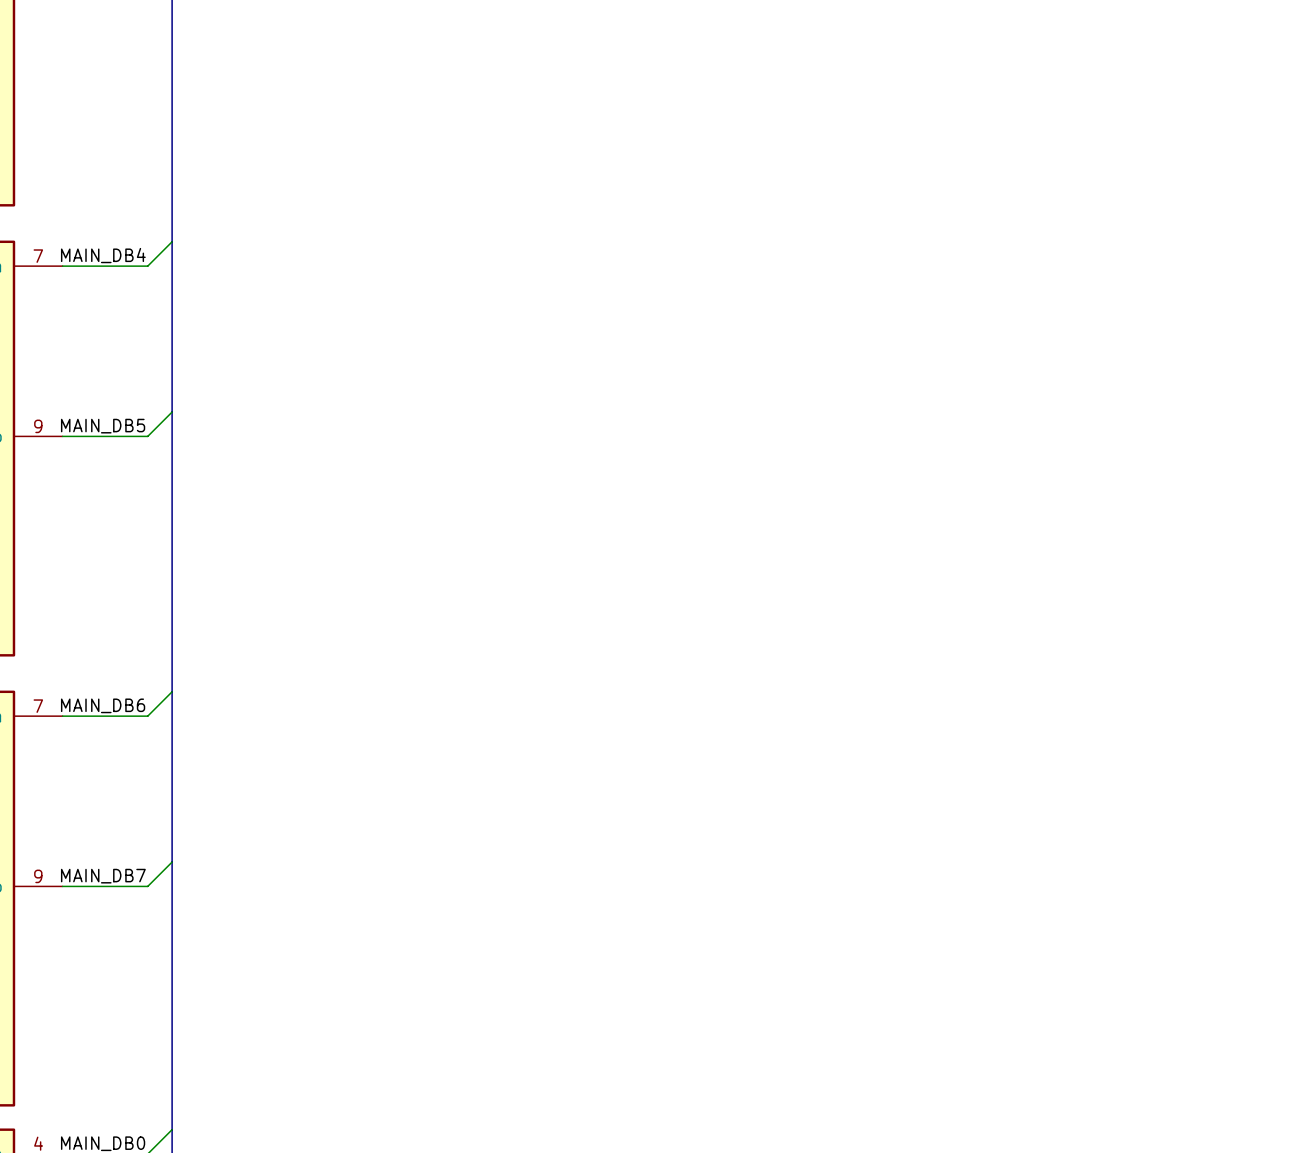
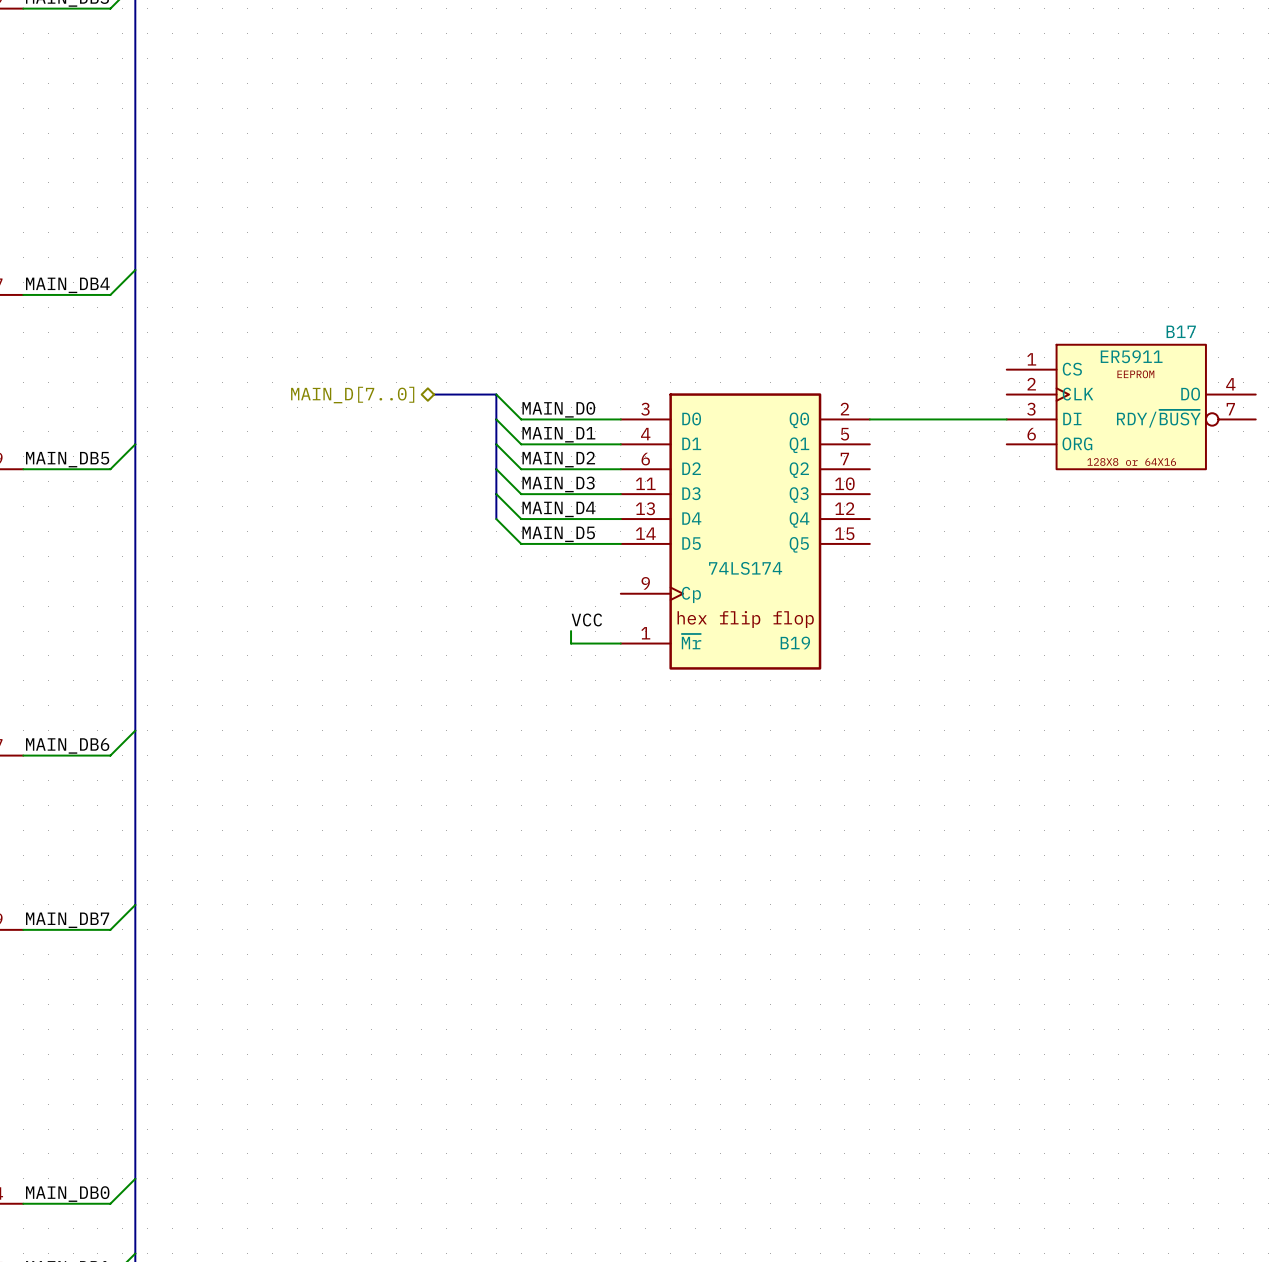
bus: none -> (434, 394) (496, 394) (496, 519)
wire: none -> (496, 394) (521, 419) (620, 419)
hierarchical label: none -> MAIN_D[7..0] (352, 395)
B17: none -> ER5911 (1131, 407)
label: none -> MAIN_D0 (558, 409)
wire: none -> (496, 419) (521, 444) (620, 444)
wire: none -> (869, 419) (1006, 419)
label: none -> MAIN_D1 (558, 434)
wire: none -> (496, 444) (521, 469) (620, 469)
label: none -> MAIN_D2 (558, 459)
wire: none -> (496, 469) (521, 494) (620, 494)
label: none -> MAIN_D3 (558, 484)
wire: none -> (496, 494) (521, 519) (620, 519)
label: none -> MAIN_D4 (558, 509)
wire: none -> (496, 519) (521, 543) (620, 543)
B19: none -> 74LS174 (745, 531)
label: none -> MAIN_D5 (558, 534)
label: none -> VCC (586, 619)
wire: none -> (571, 631) (571, 643) (620, 643)

